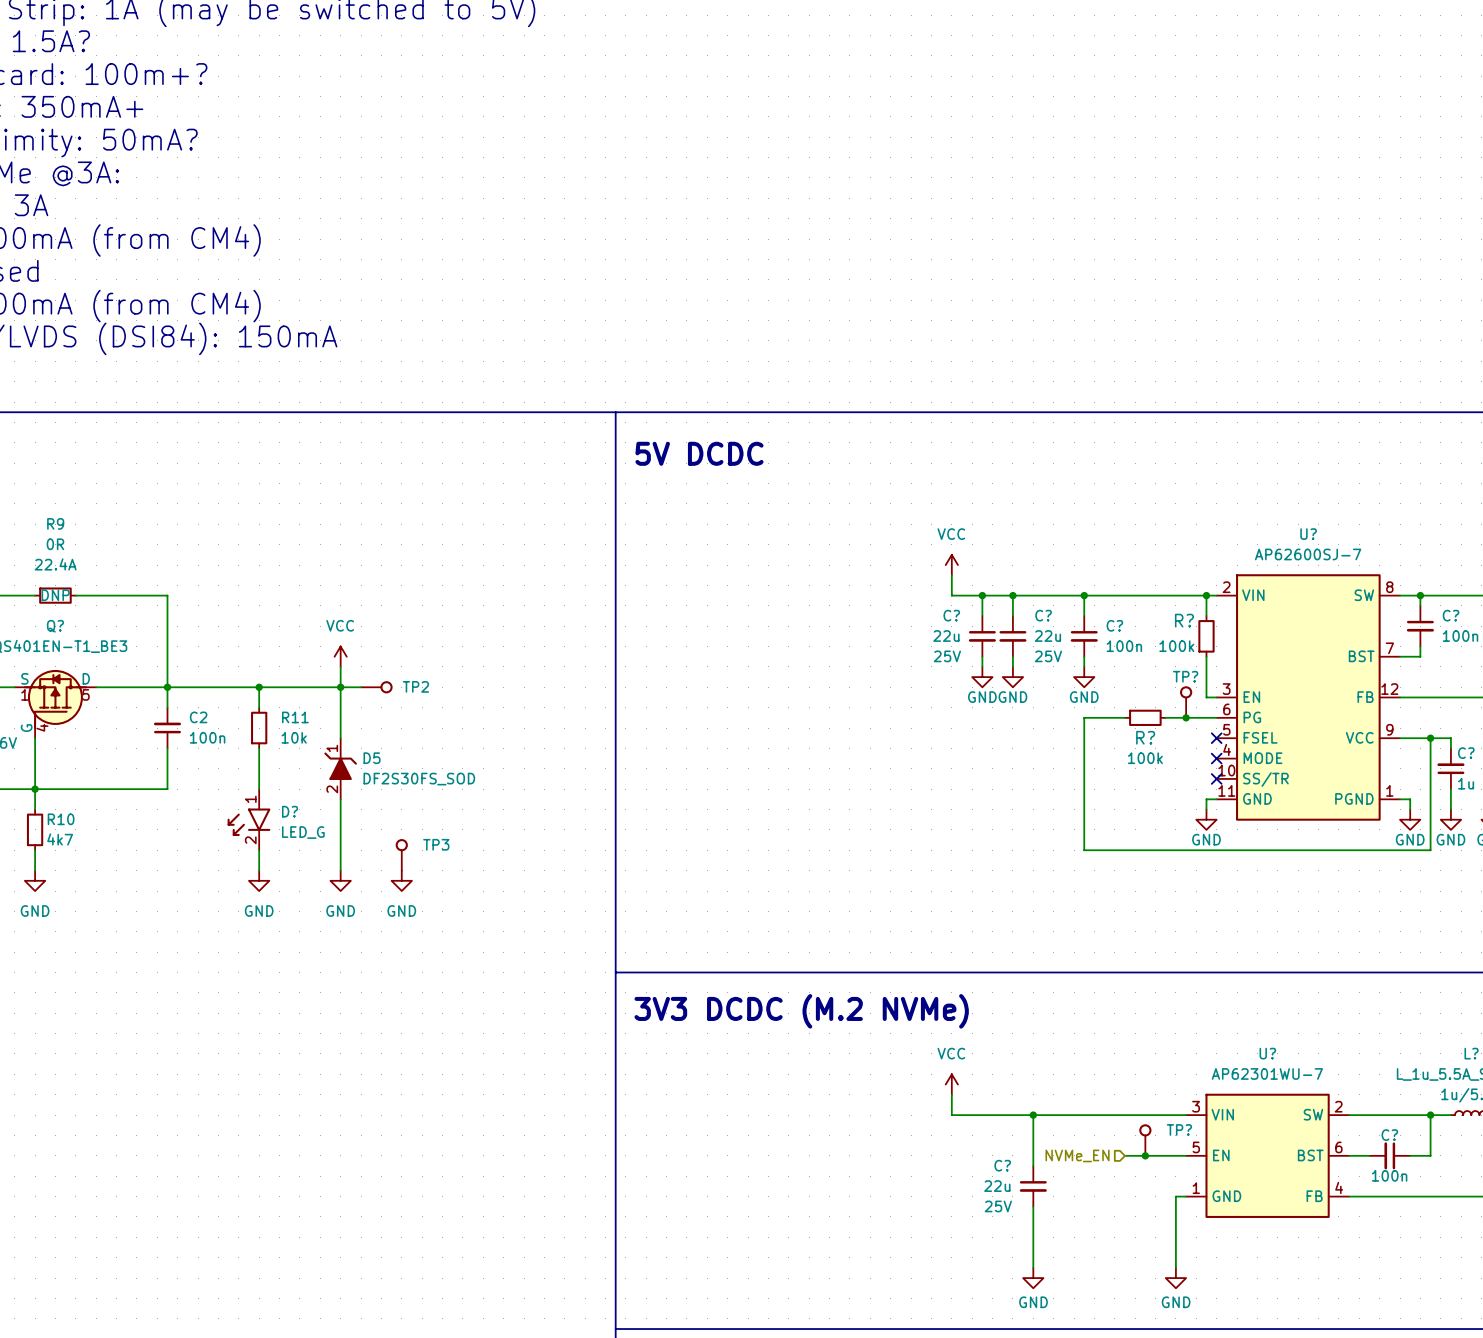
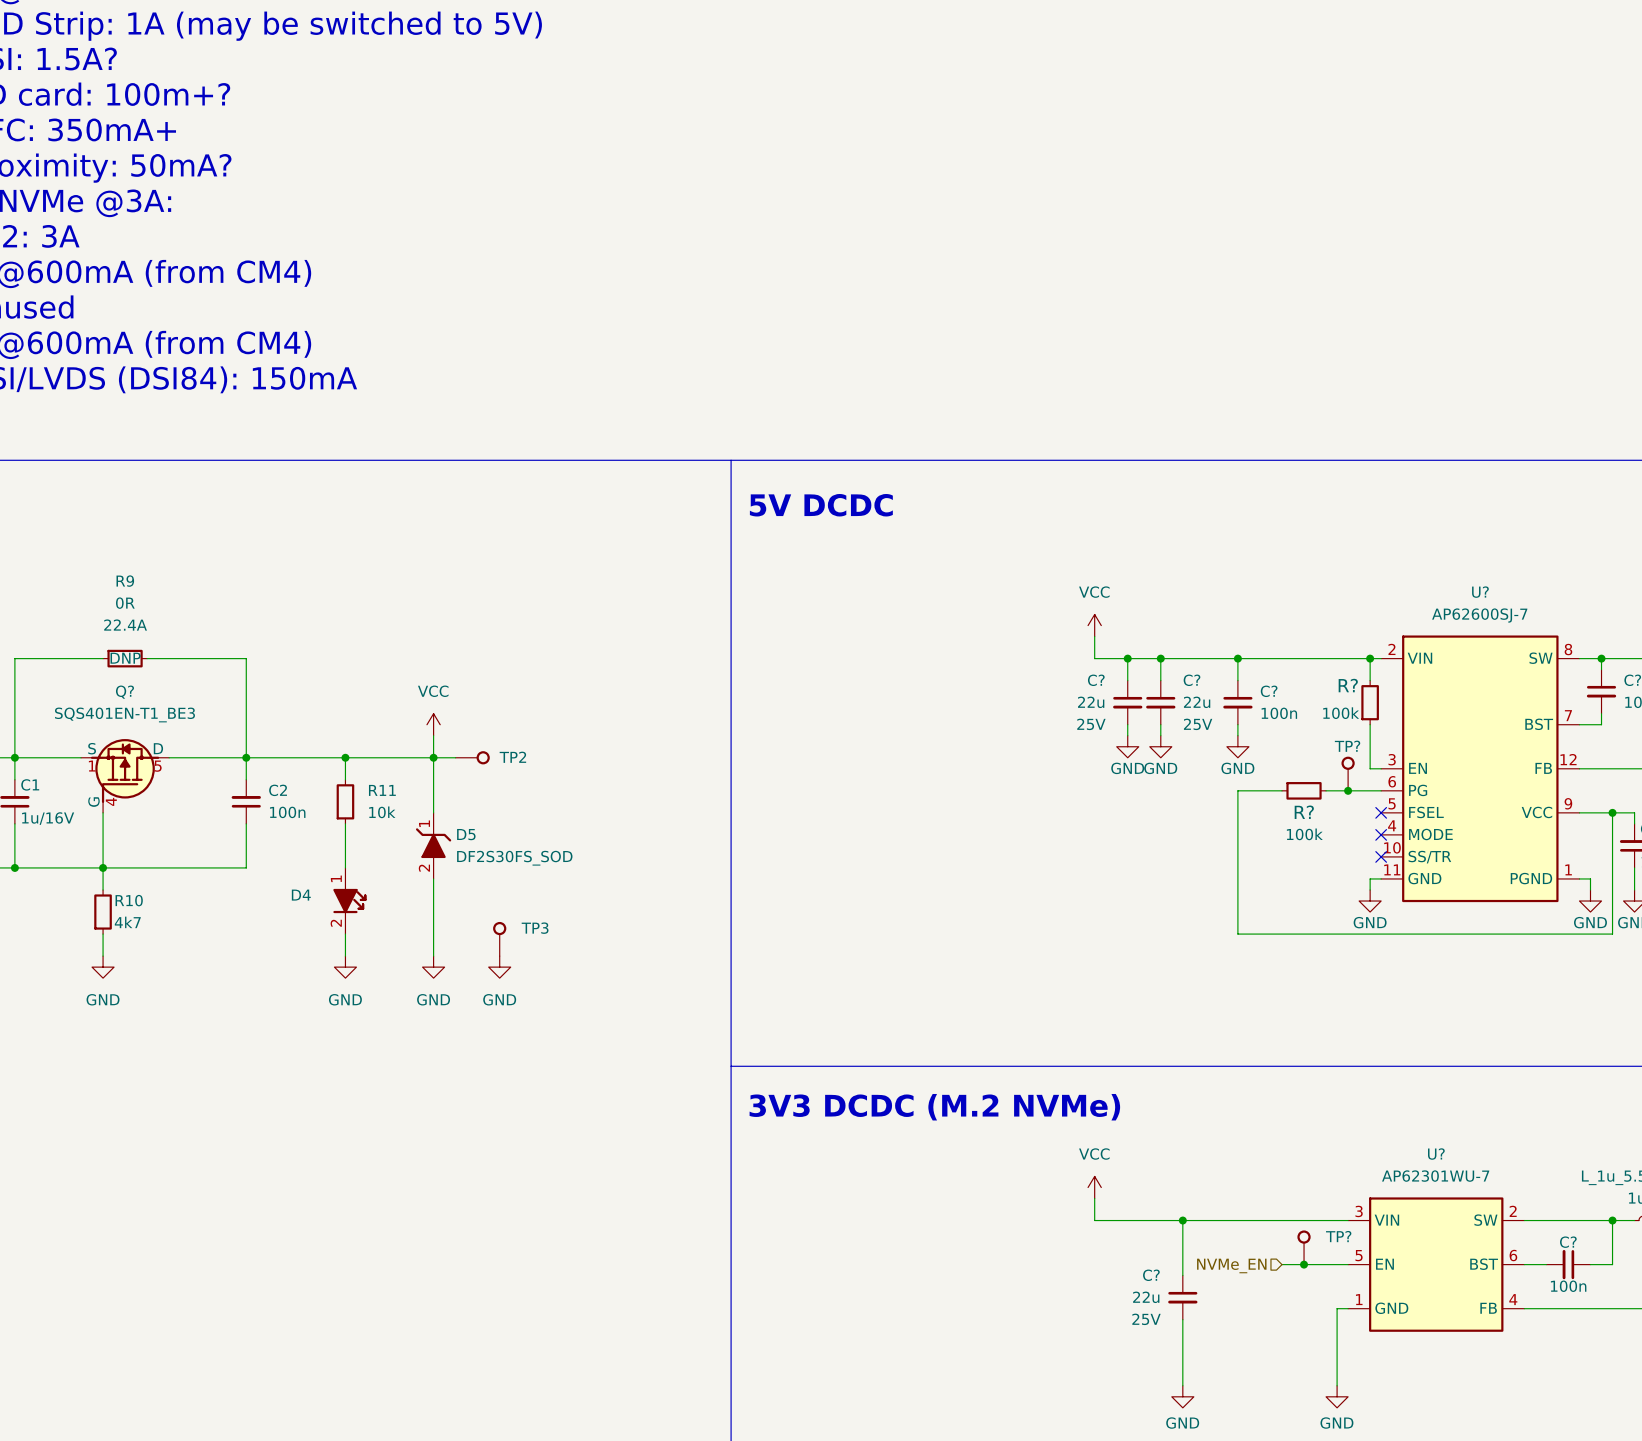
D?: LED_G (248, 819) -> none
D4: none -> (349, 901)

